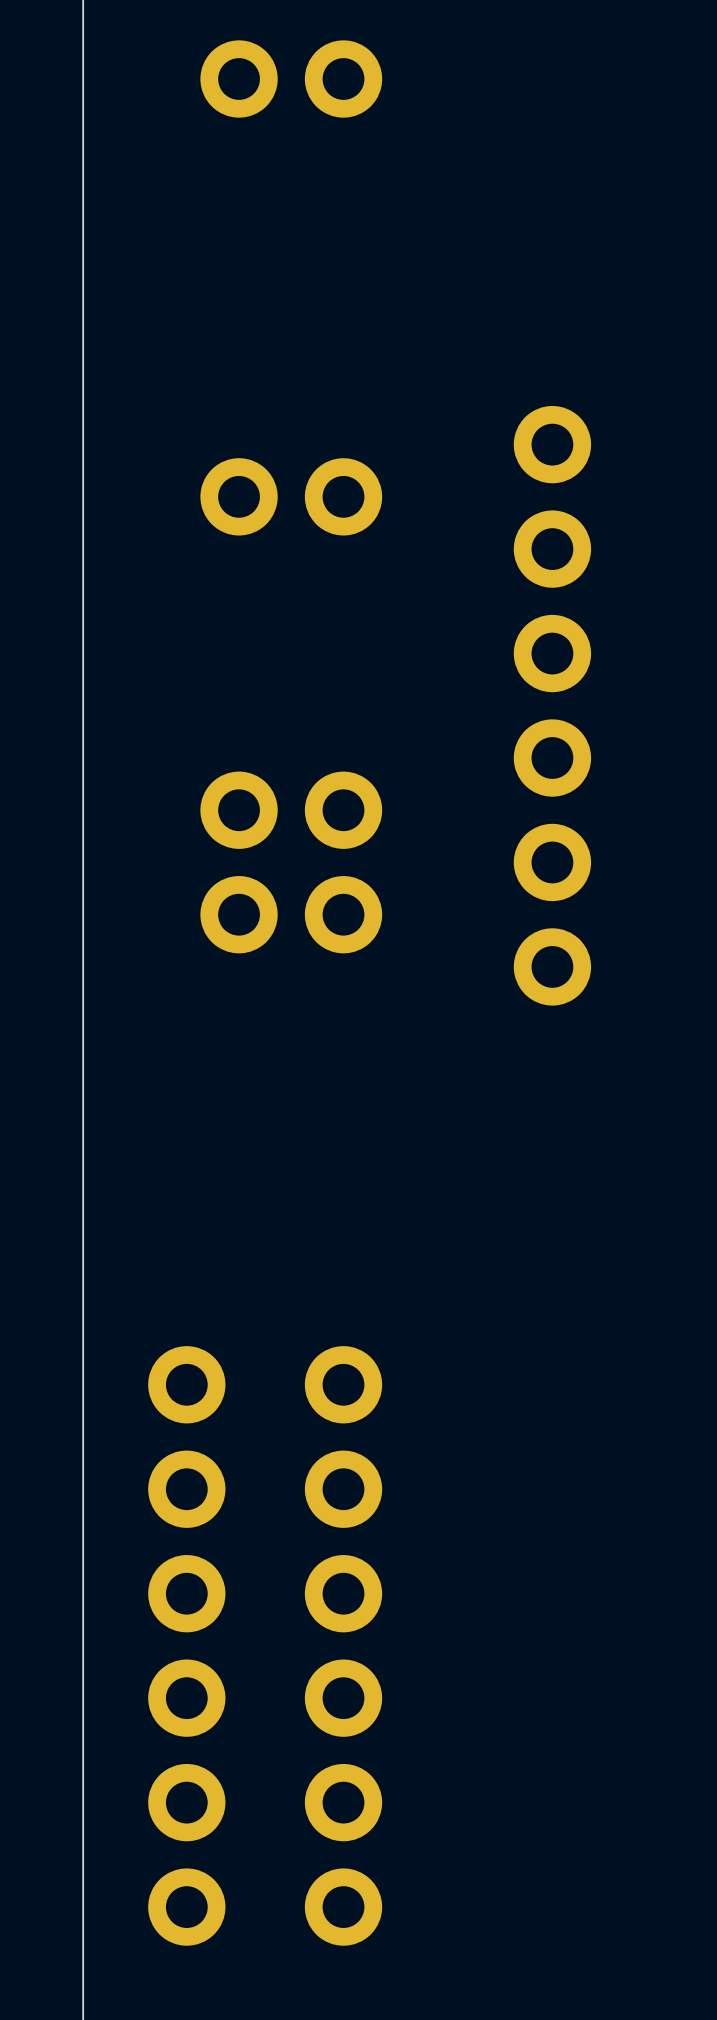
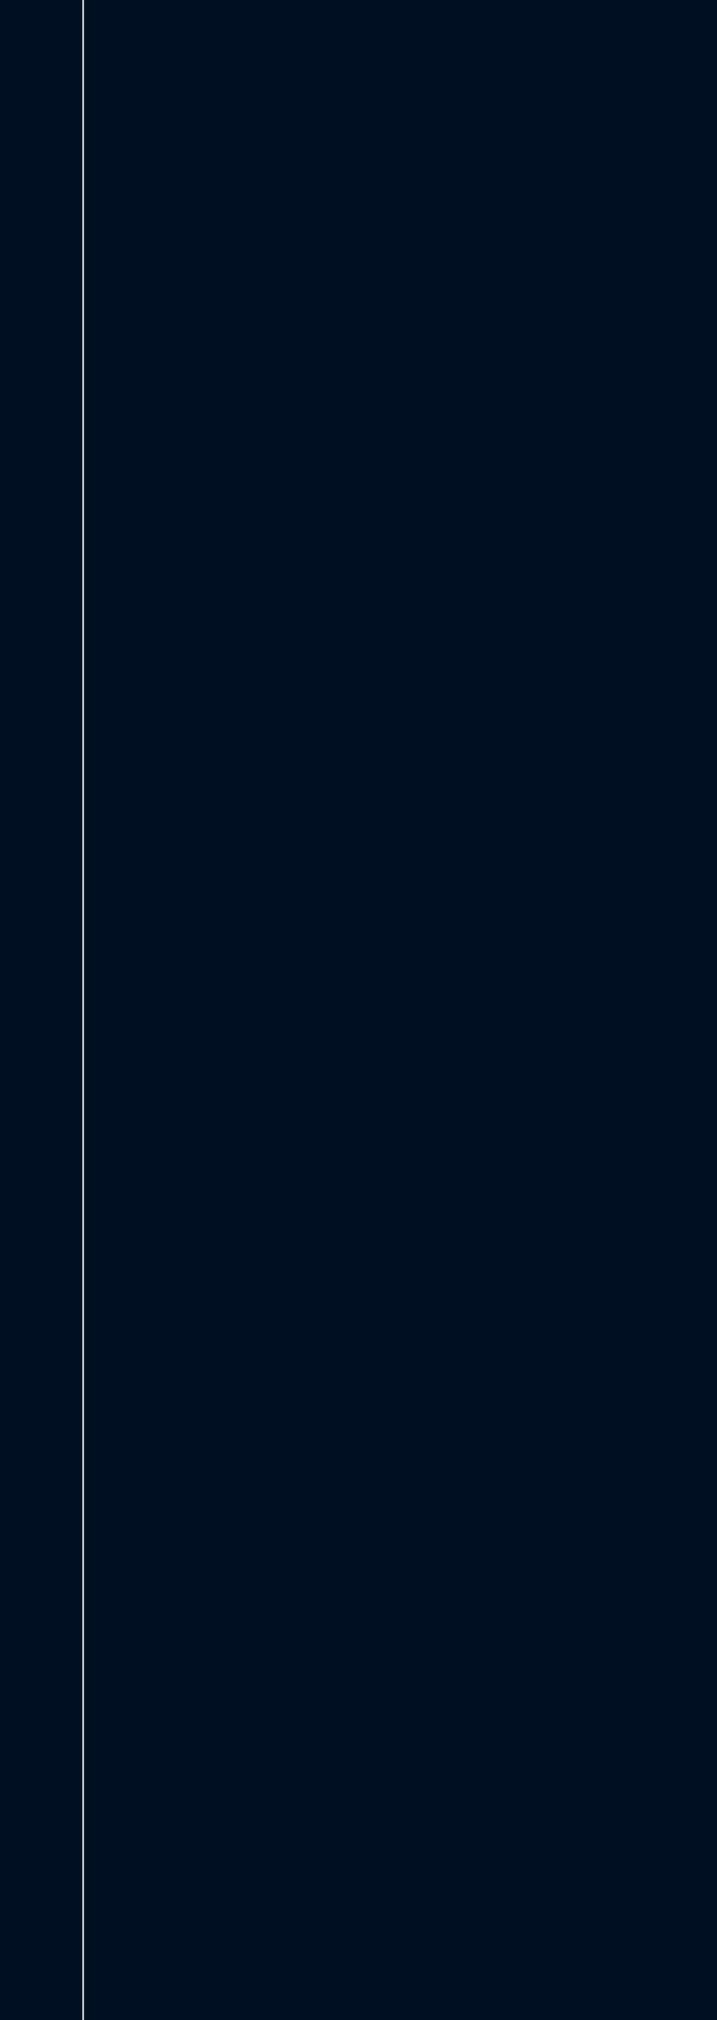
part: (291, 79) -> none
part: (291, 496) -> none
part: (552, 705) -> none
part: (291, 810) -> none
part: (291, 914) -> none
part: (186, 1645) -> none
part: (343, 1645) -> none

